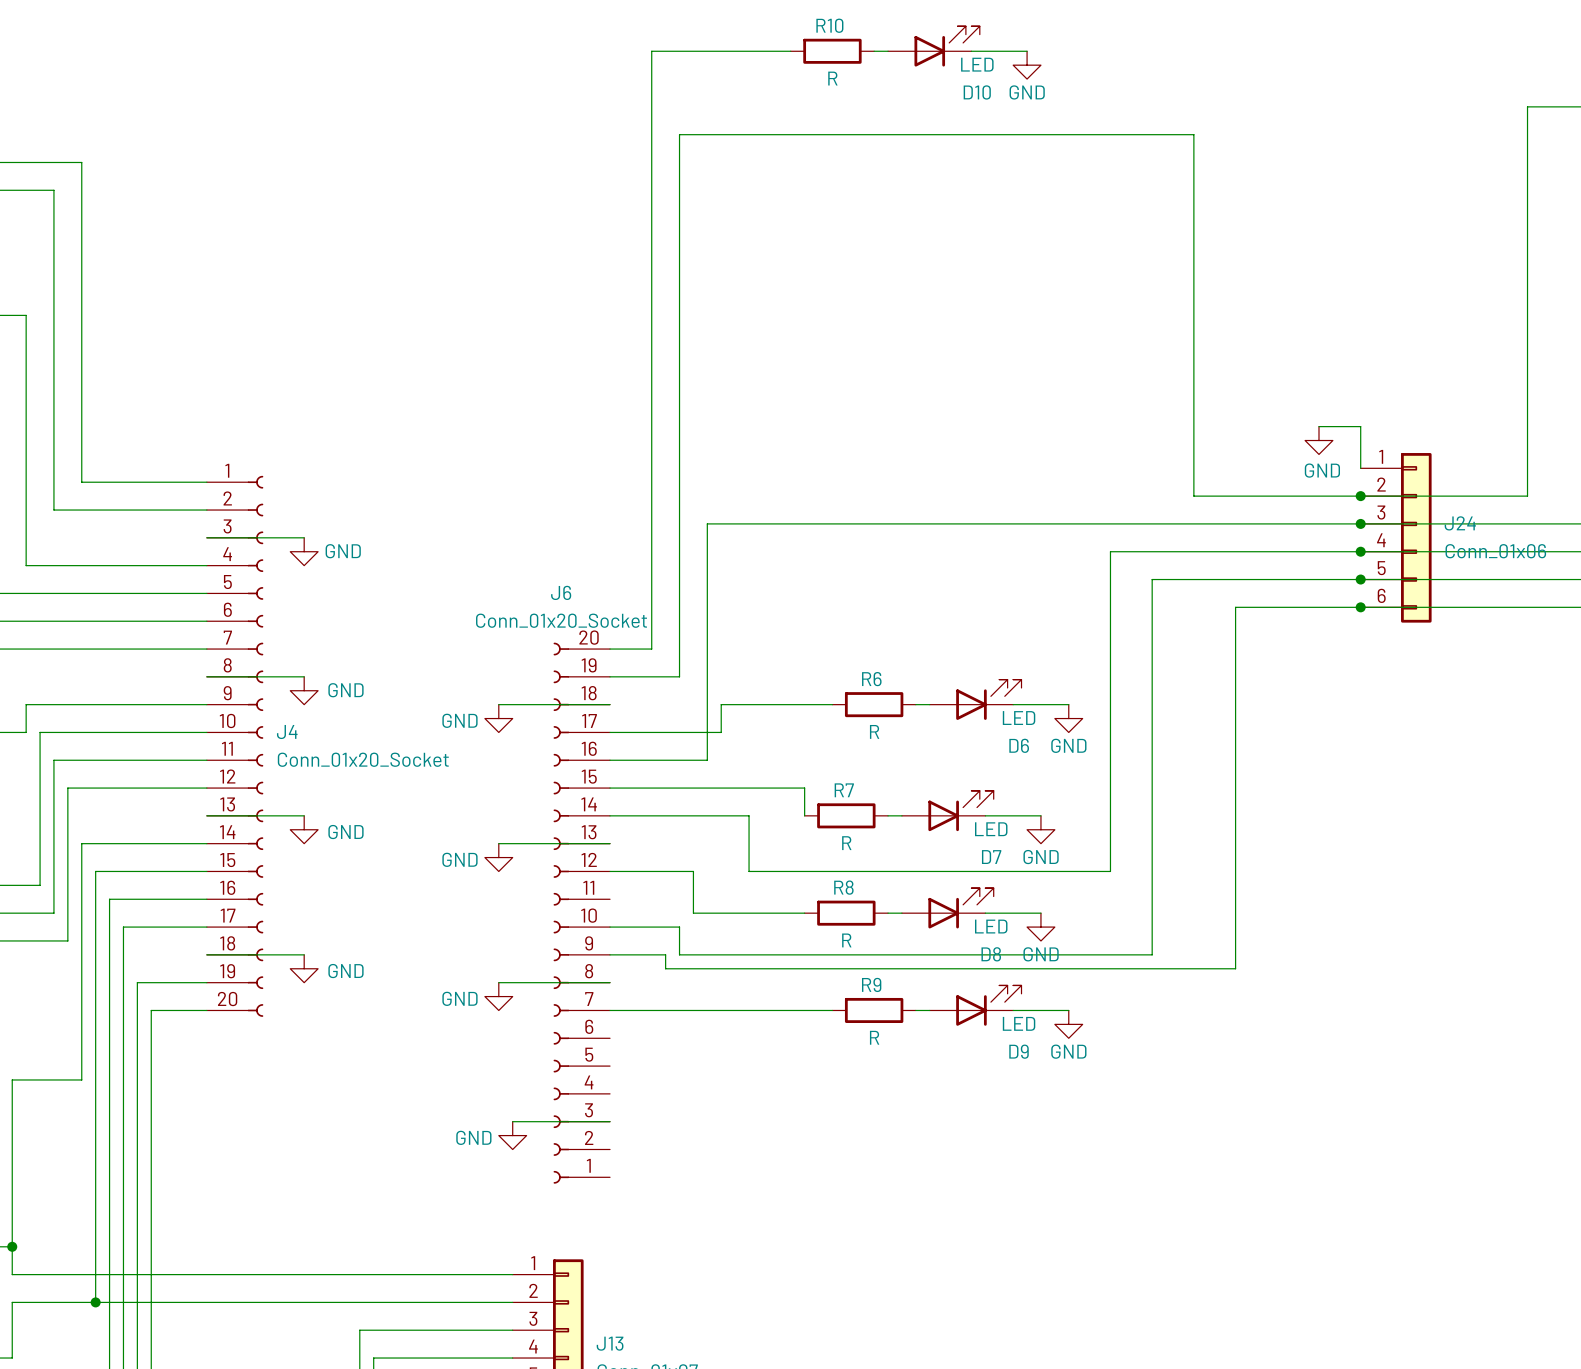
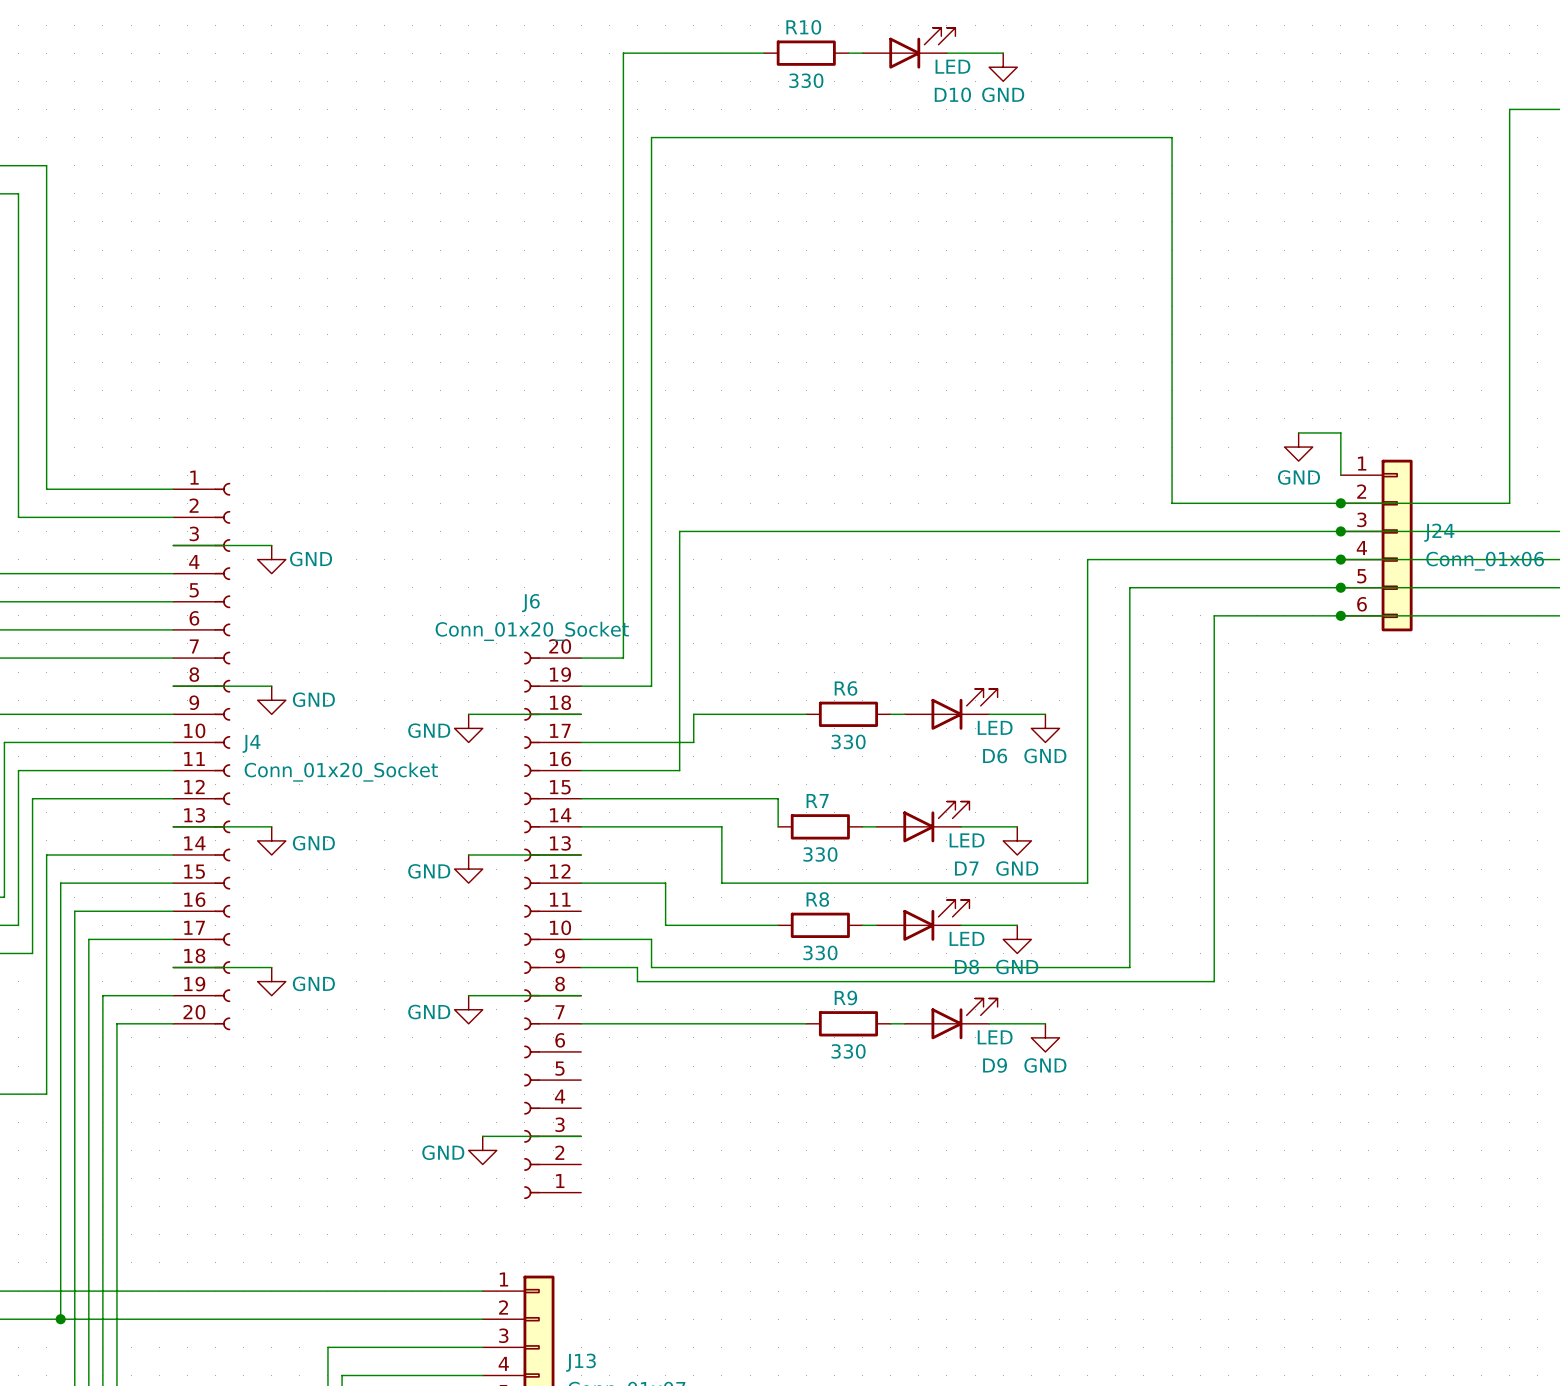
R10 value: R (832, 78) -> 330 (806, 80)
R6 value: R (874, 731) -> 330 (848, 741)
R7 value: R (846, 843) -> 330 (820, 854)
R8 value: R (846, 940) -> 330 (820, 952)
R9 value: R (874, 1037) -> 330 (848, 1051)

